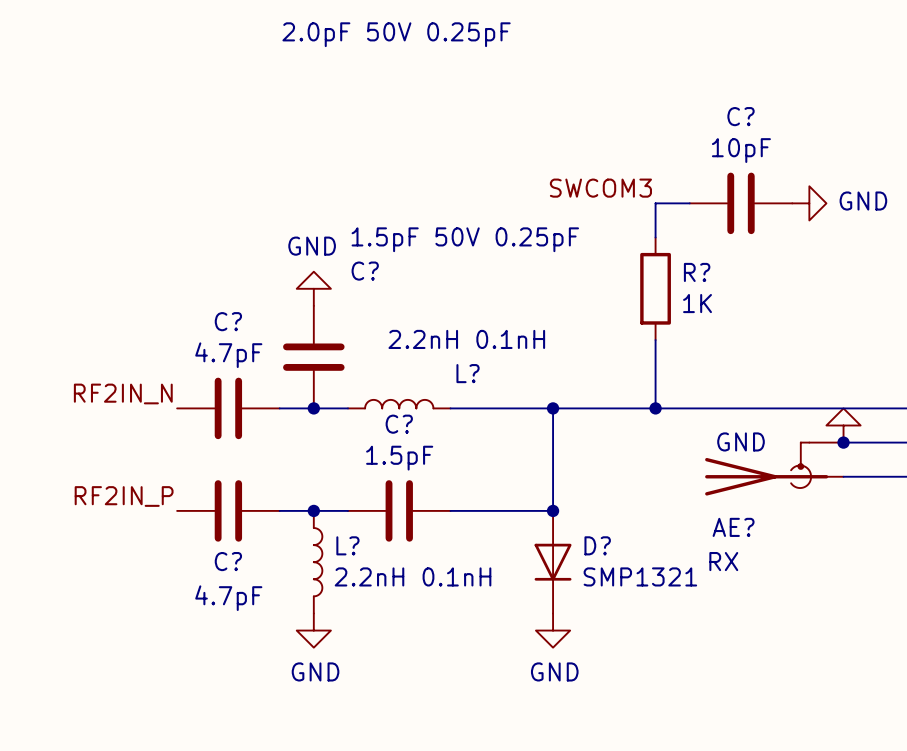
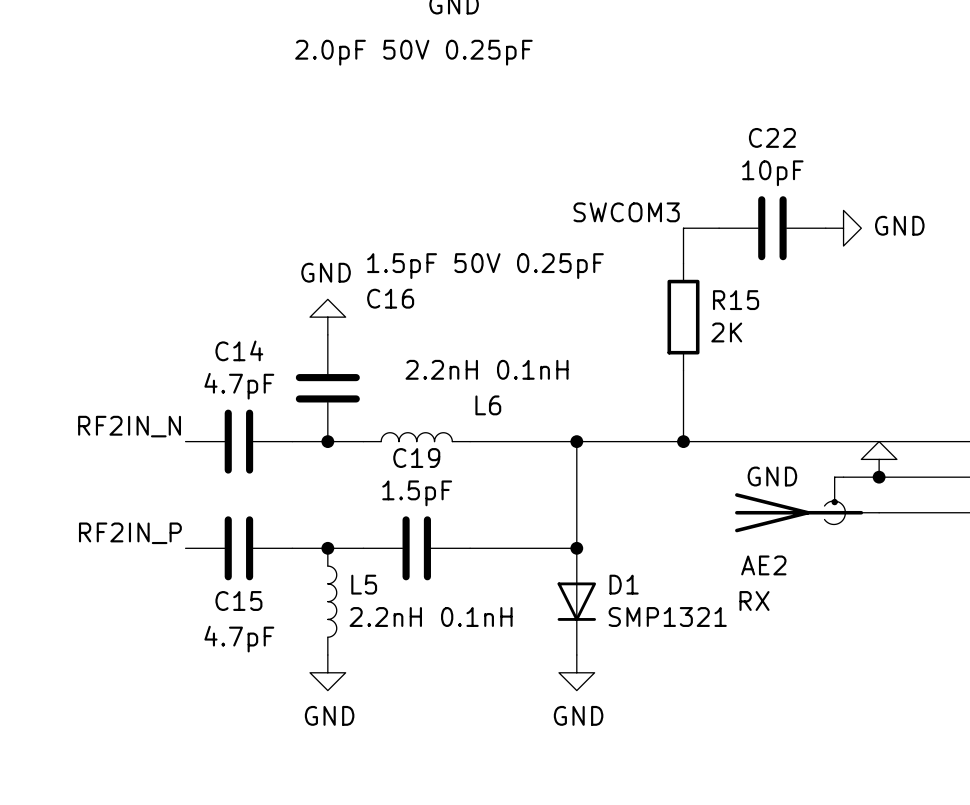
C? name: C? (741, 116) -> C22 (772, 137)
C? name: C? (365, 271) -> C16 (390, 298)
R? name: R? (697, 272) -> R15 (736, 300)
R? value: 1K (697, 303) -> 2K (726, 332)
C? name: C? (228, 321) -> C14 (239, 350)
L? name: L? (468, 373) -> L6 (488, 405)
C? name: C? (399, 424) -> C19 (416, 458)
AE? name: AE? (733, 527) -> AE2 (763, 565)
L? name: L? (347, 545) -> L5 (364, 584)
D? name: D? (597, 545) -> D1 (624, 584)
C? name: C? (228, 561) -> C15 (238, 601)

